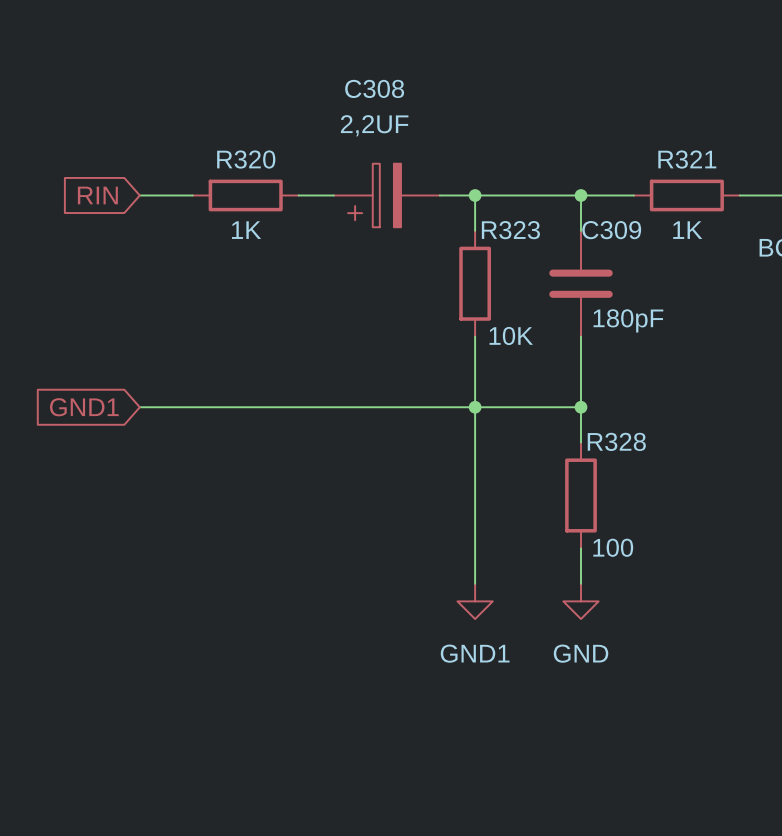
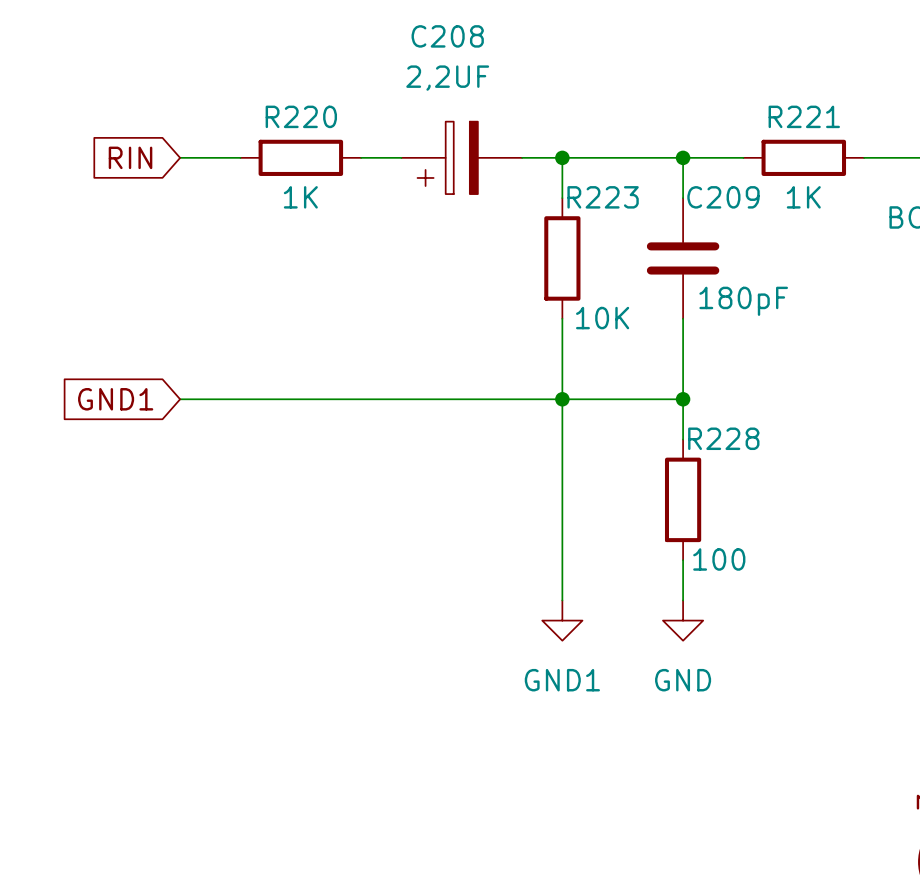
C308 name: C308 (374, 88) -> C208 (447, 36)
R320 name: R320 (246, 159) -> R220 (301, 116)
R321 name: R321 (687, 159) -> R221 (804, 116)
R323 name: R323 (510, 230) -> R223 (603, 197)
C309 name: C309 (611, 230) -> C209 (723, 197)
R328 name: R328 (616, 441) -> R228 (723, 438)

